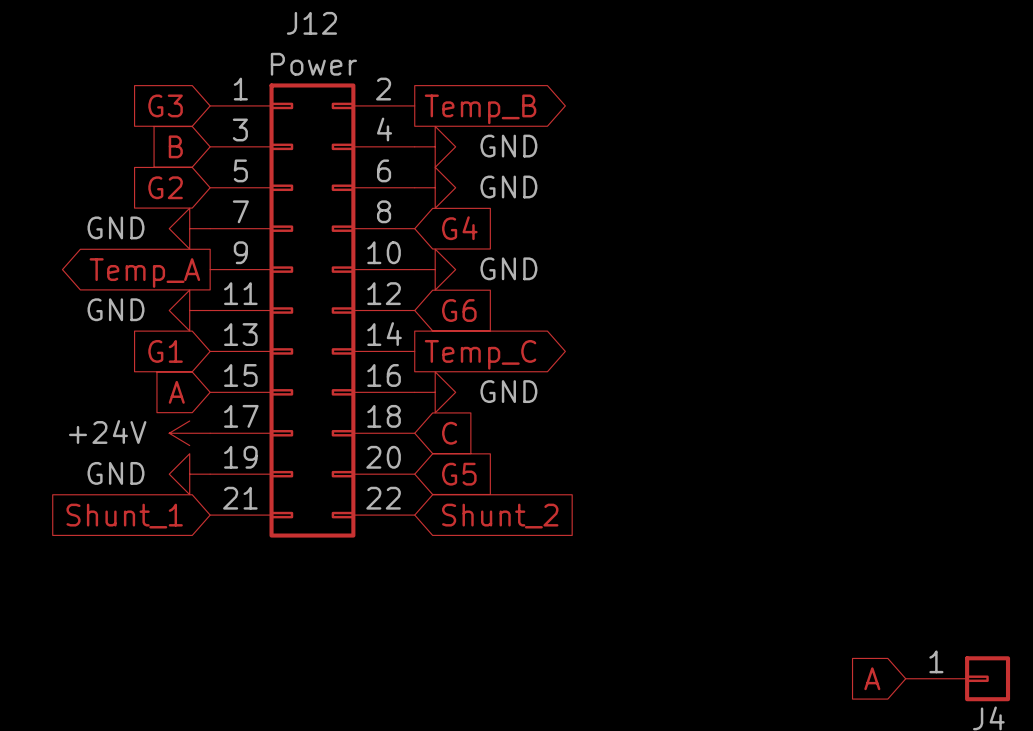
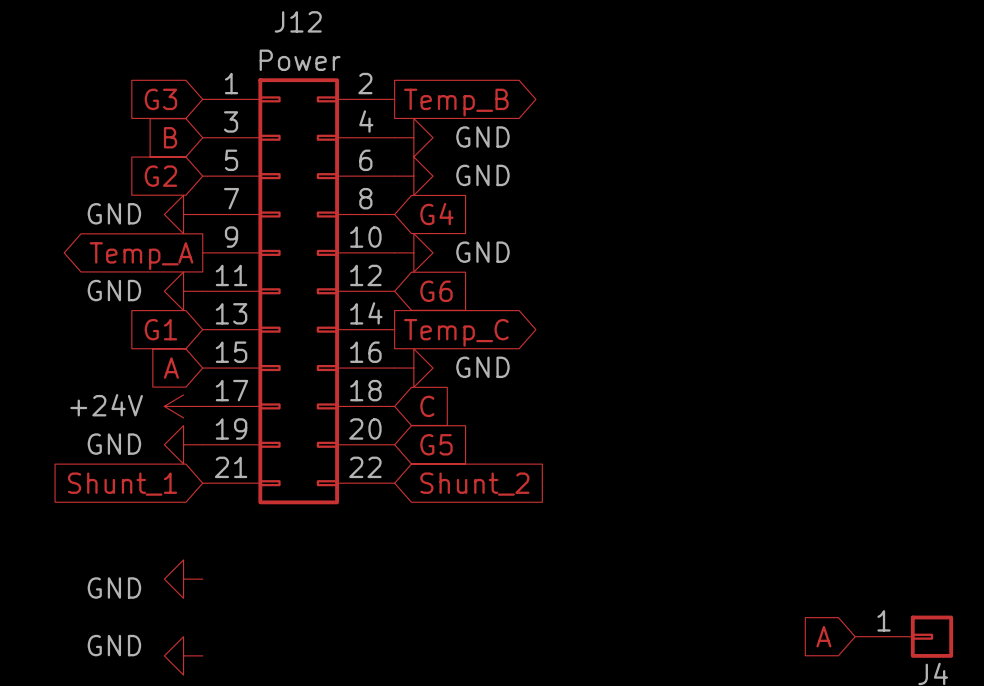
power symbol: none -> GND (183, 579)
power symbol: none -> GND (183, 655)

